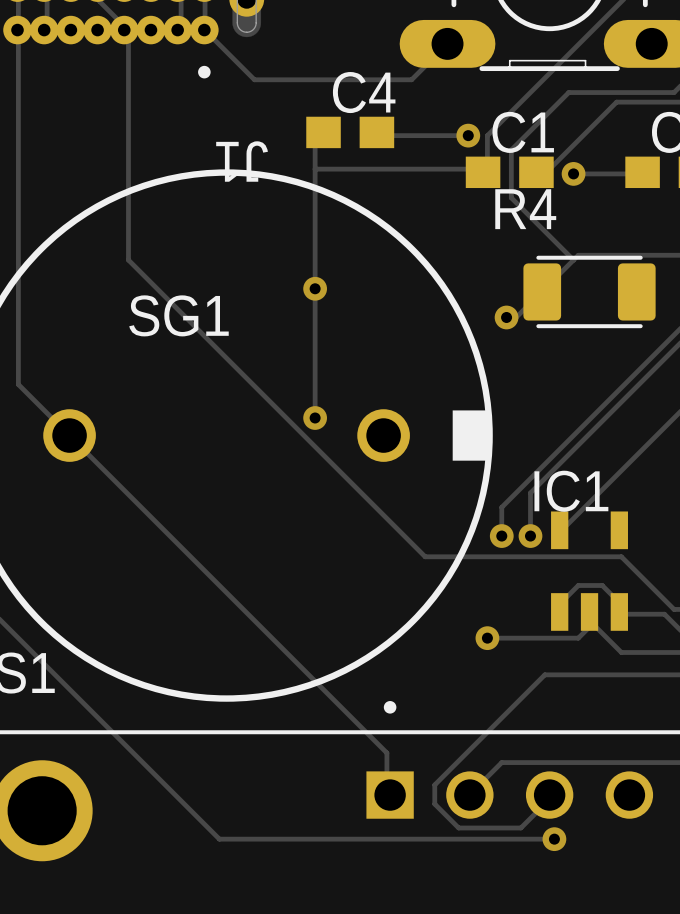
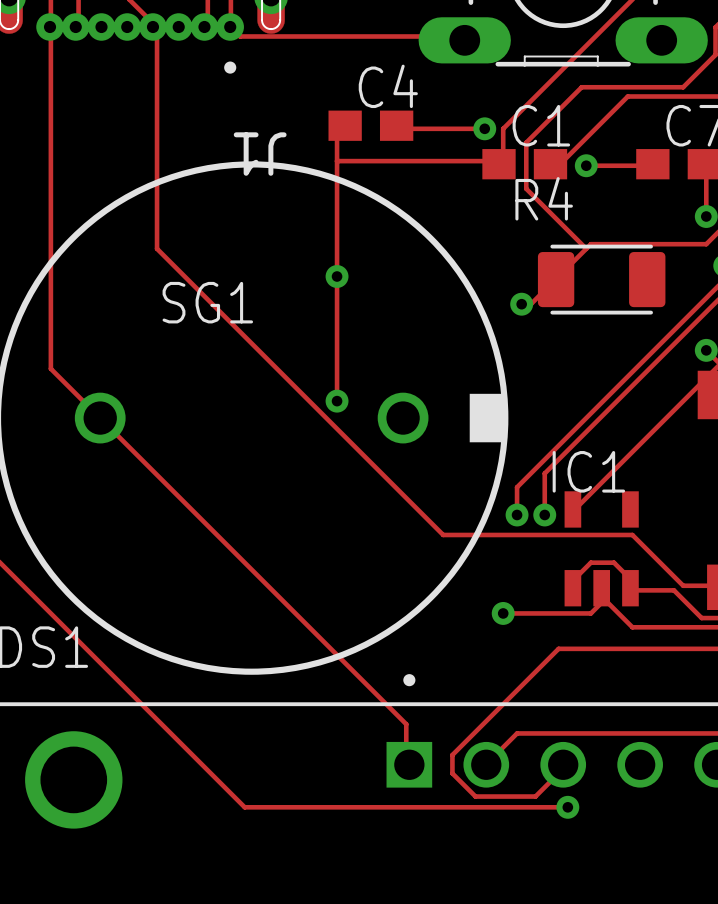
track: (214, 39) (254, 79) (411, 79) (447, 43) -> (240, 36) (461, 36) (464, 40)

